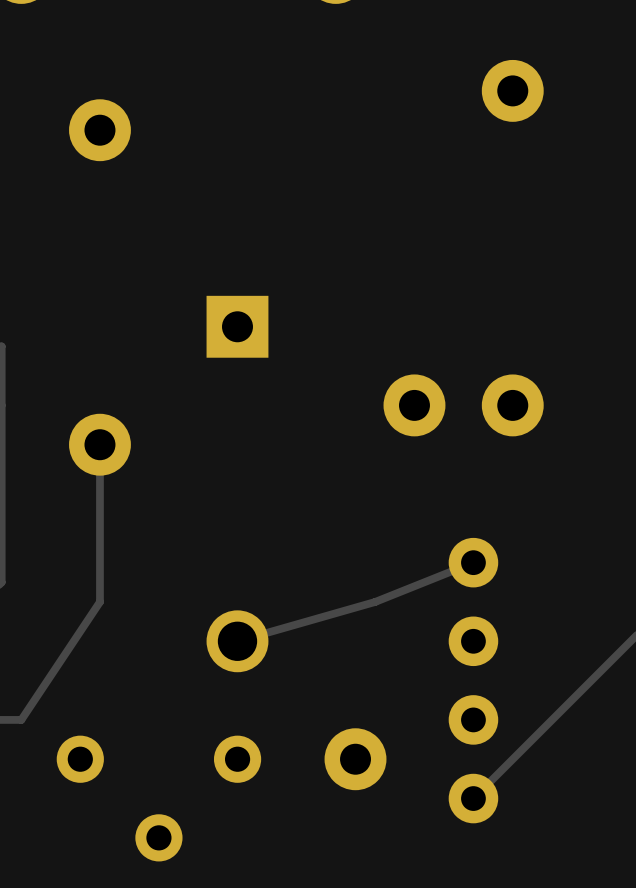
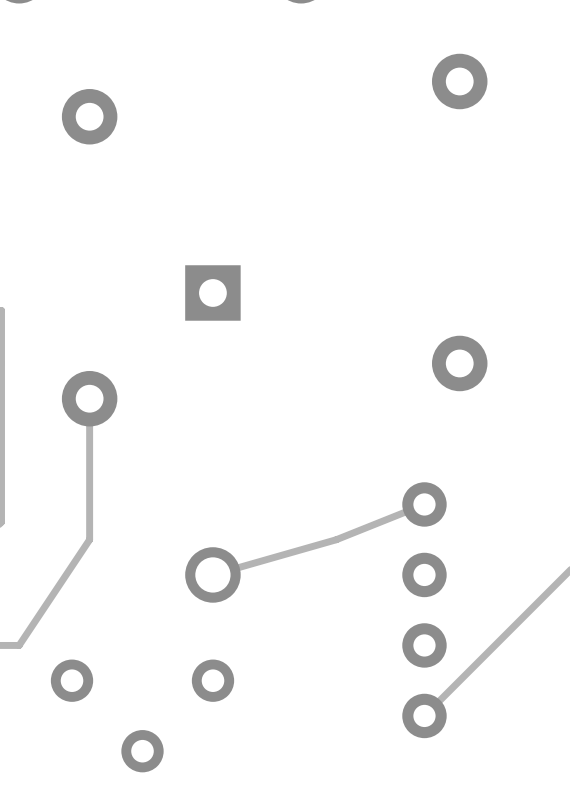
part: (414, 405) -> none
part: (355, 759) -> none

